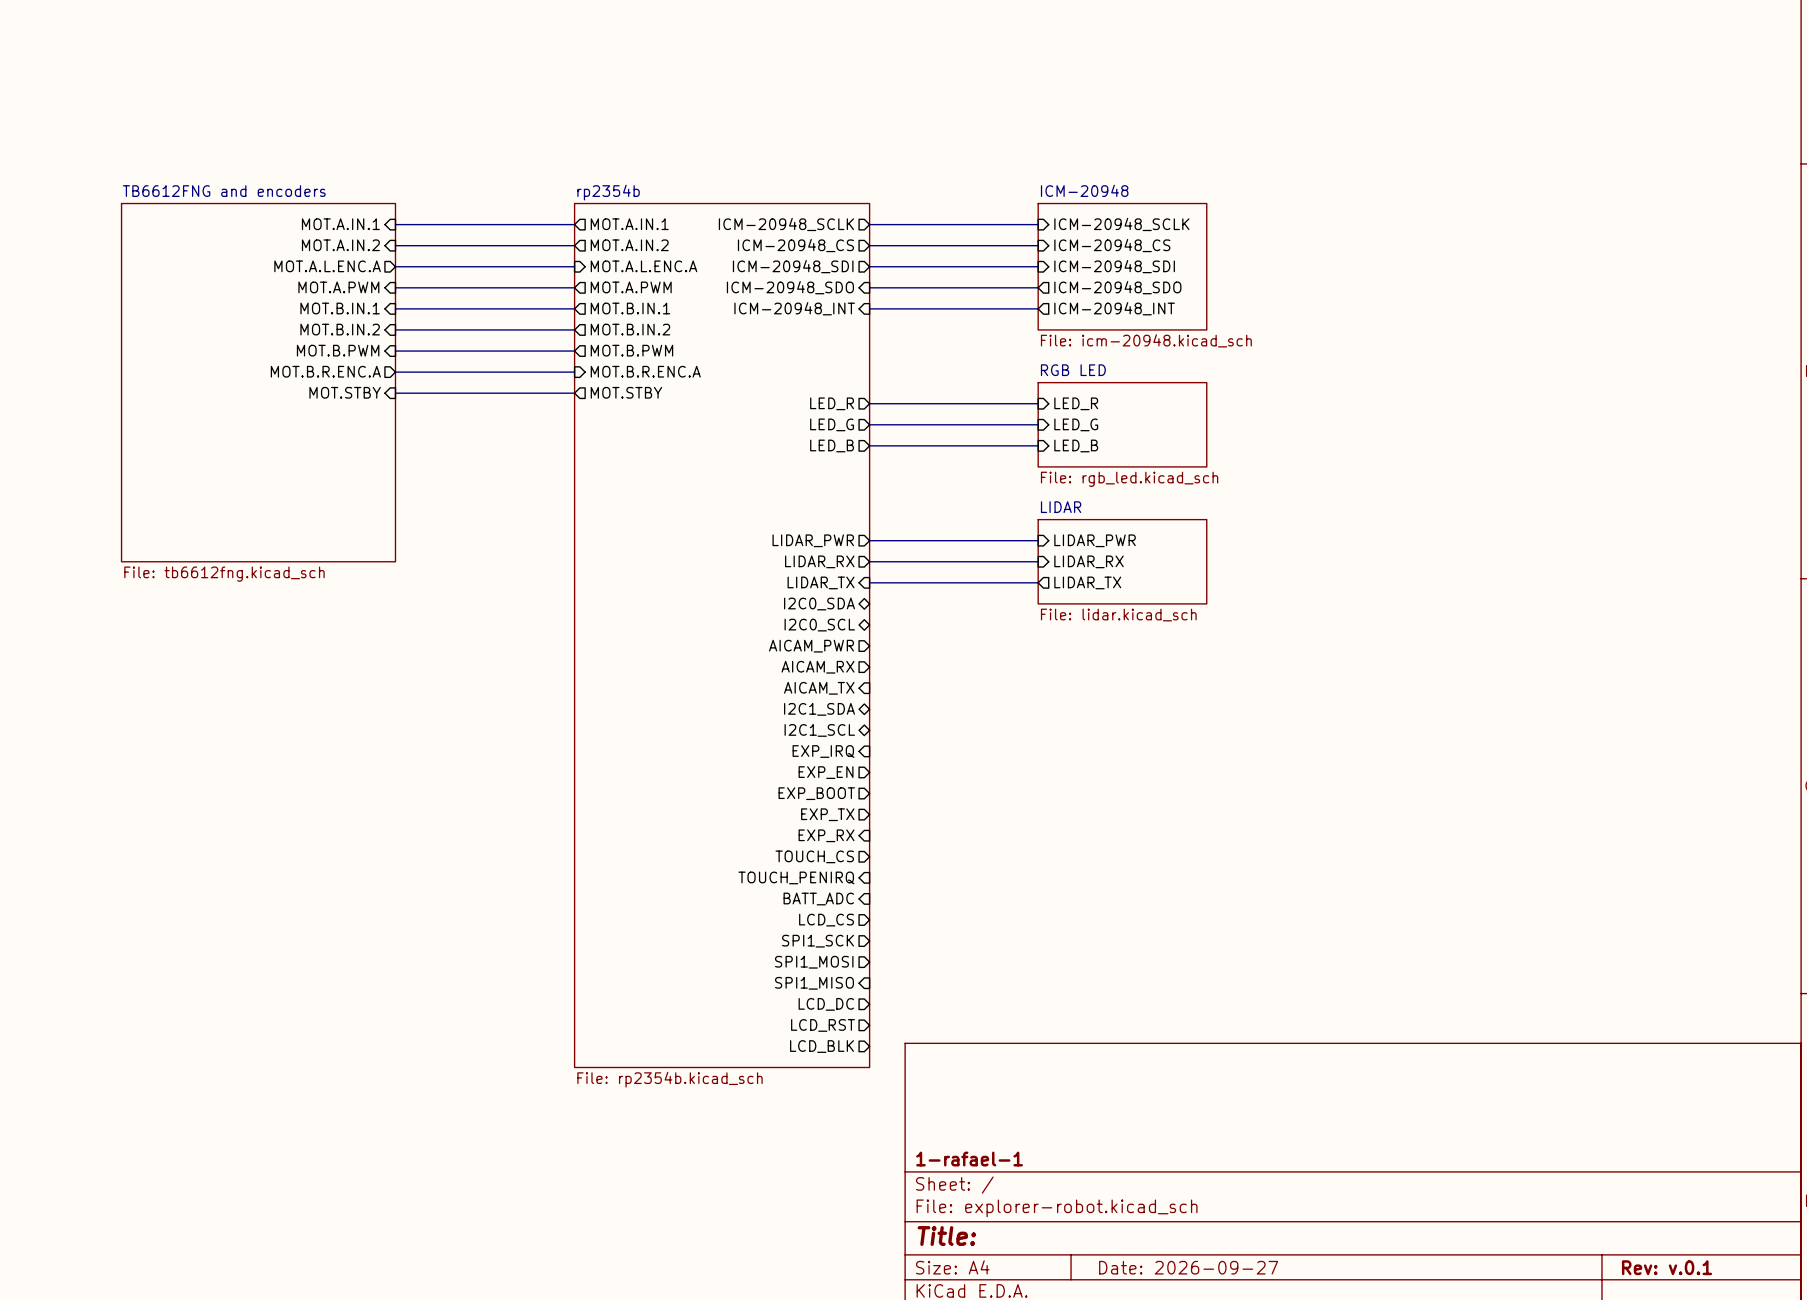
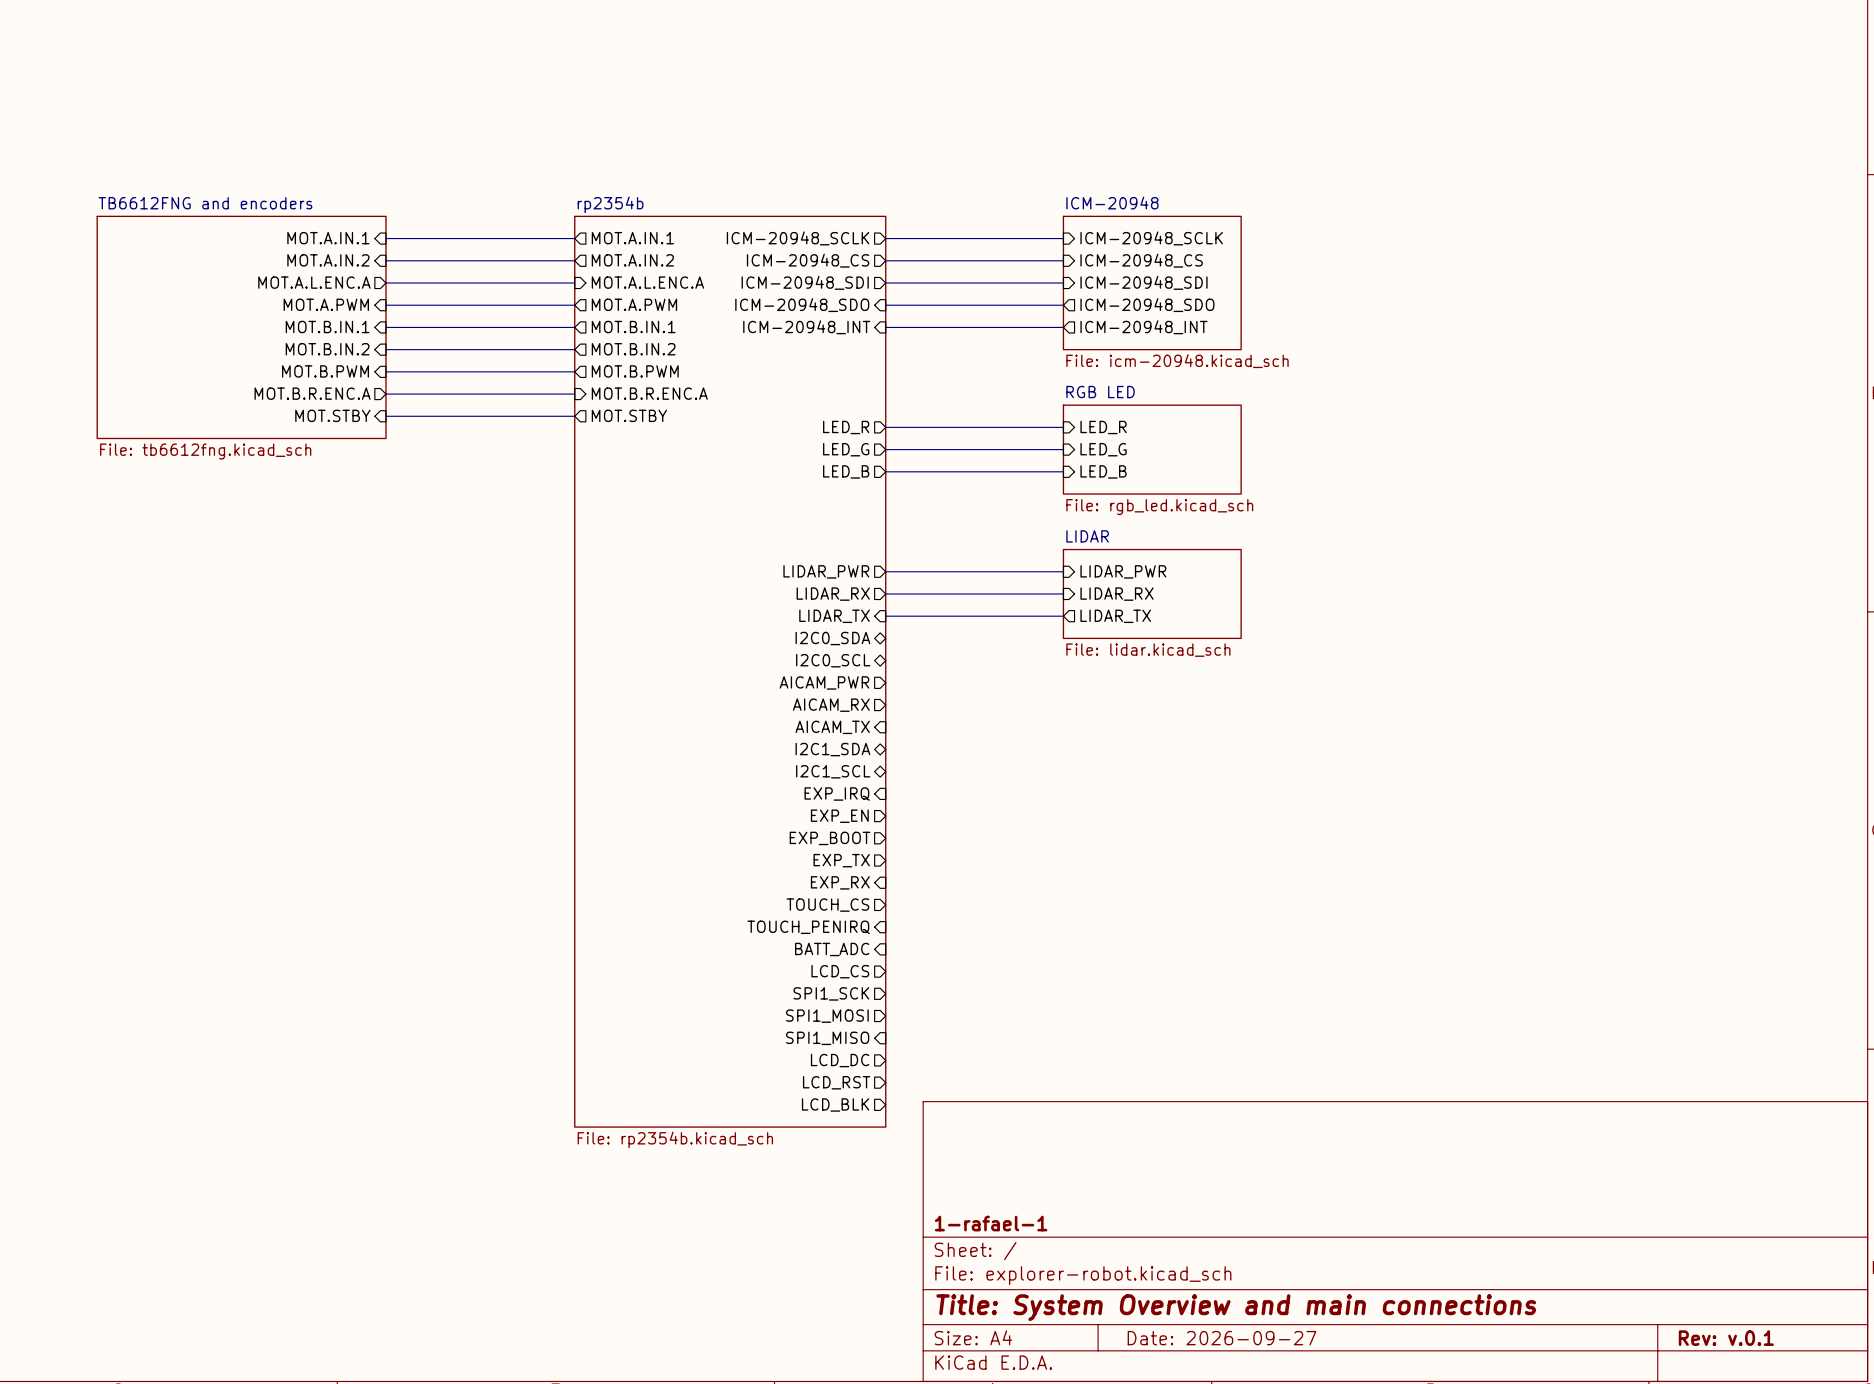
sheet TB6612FNG and encoders shape: [120, 202, 397, 563] -> [96, 215, 387, 440]
sheet TB6612FNG and encoders value position: File: tb6612fng.kicad_sch (224, 574) -> File: tb6612fng.kicad_sch (205, 451)
title block: Title: (946, 1236) -> Title: System Overview and main connections (1236, 1307)

